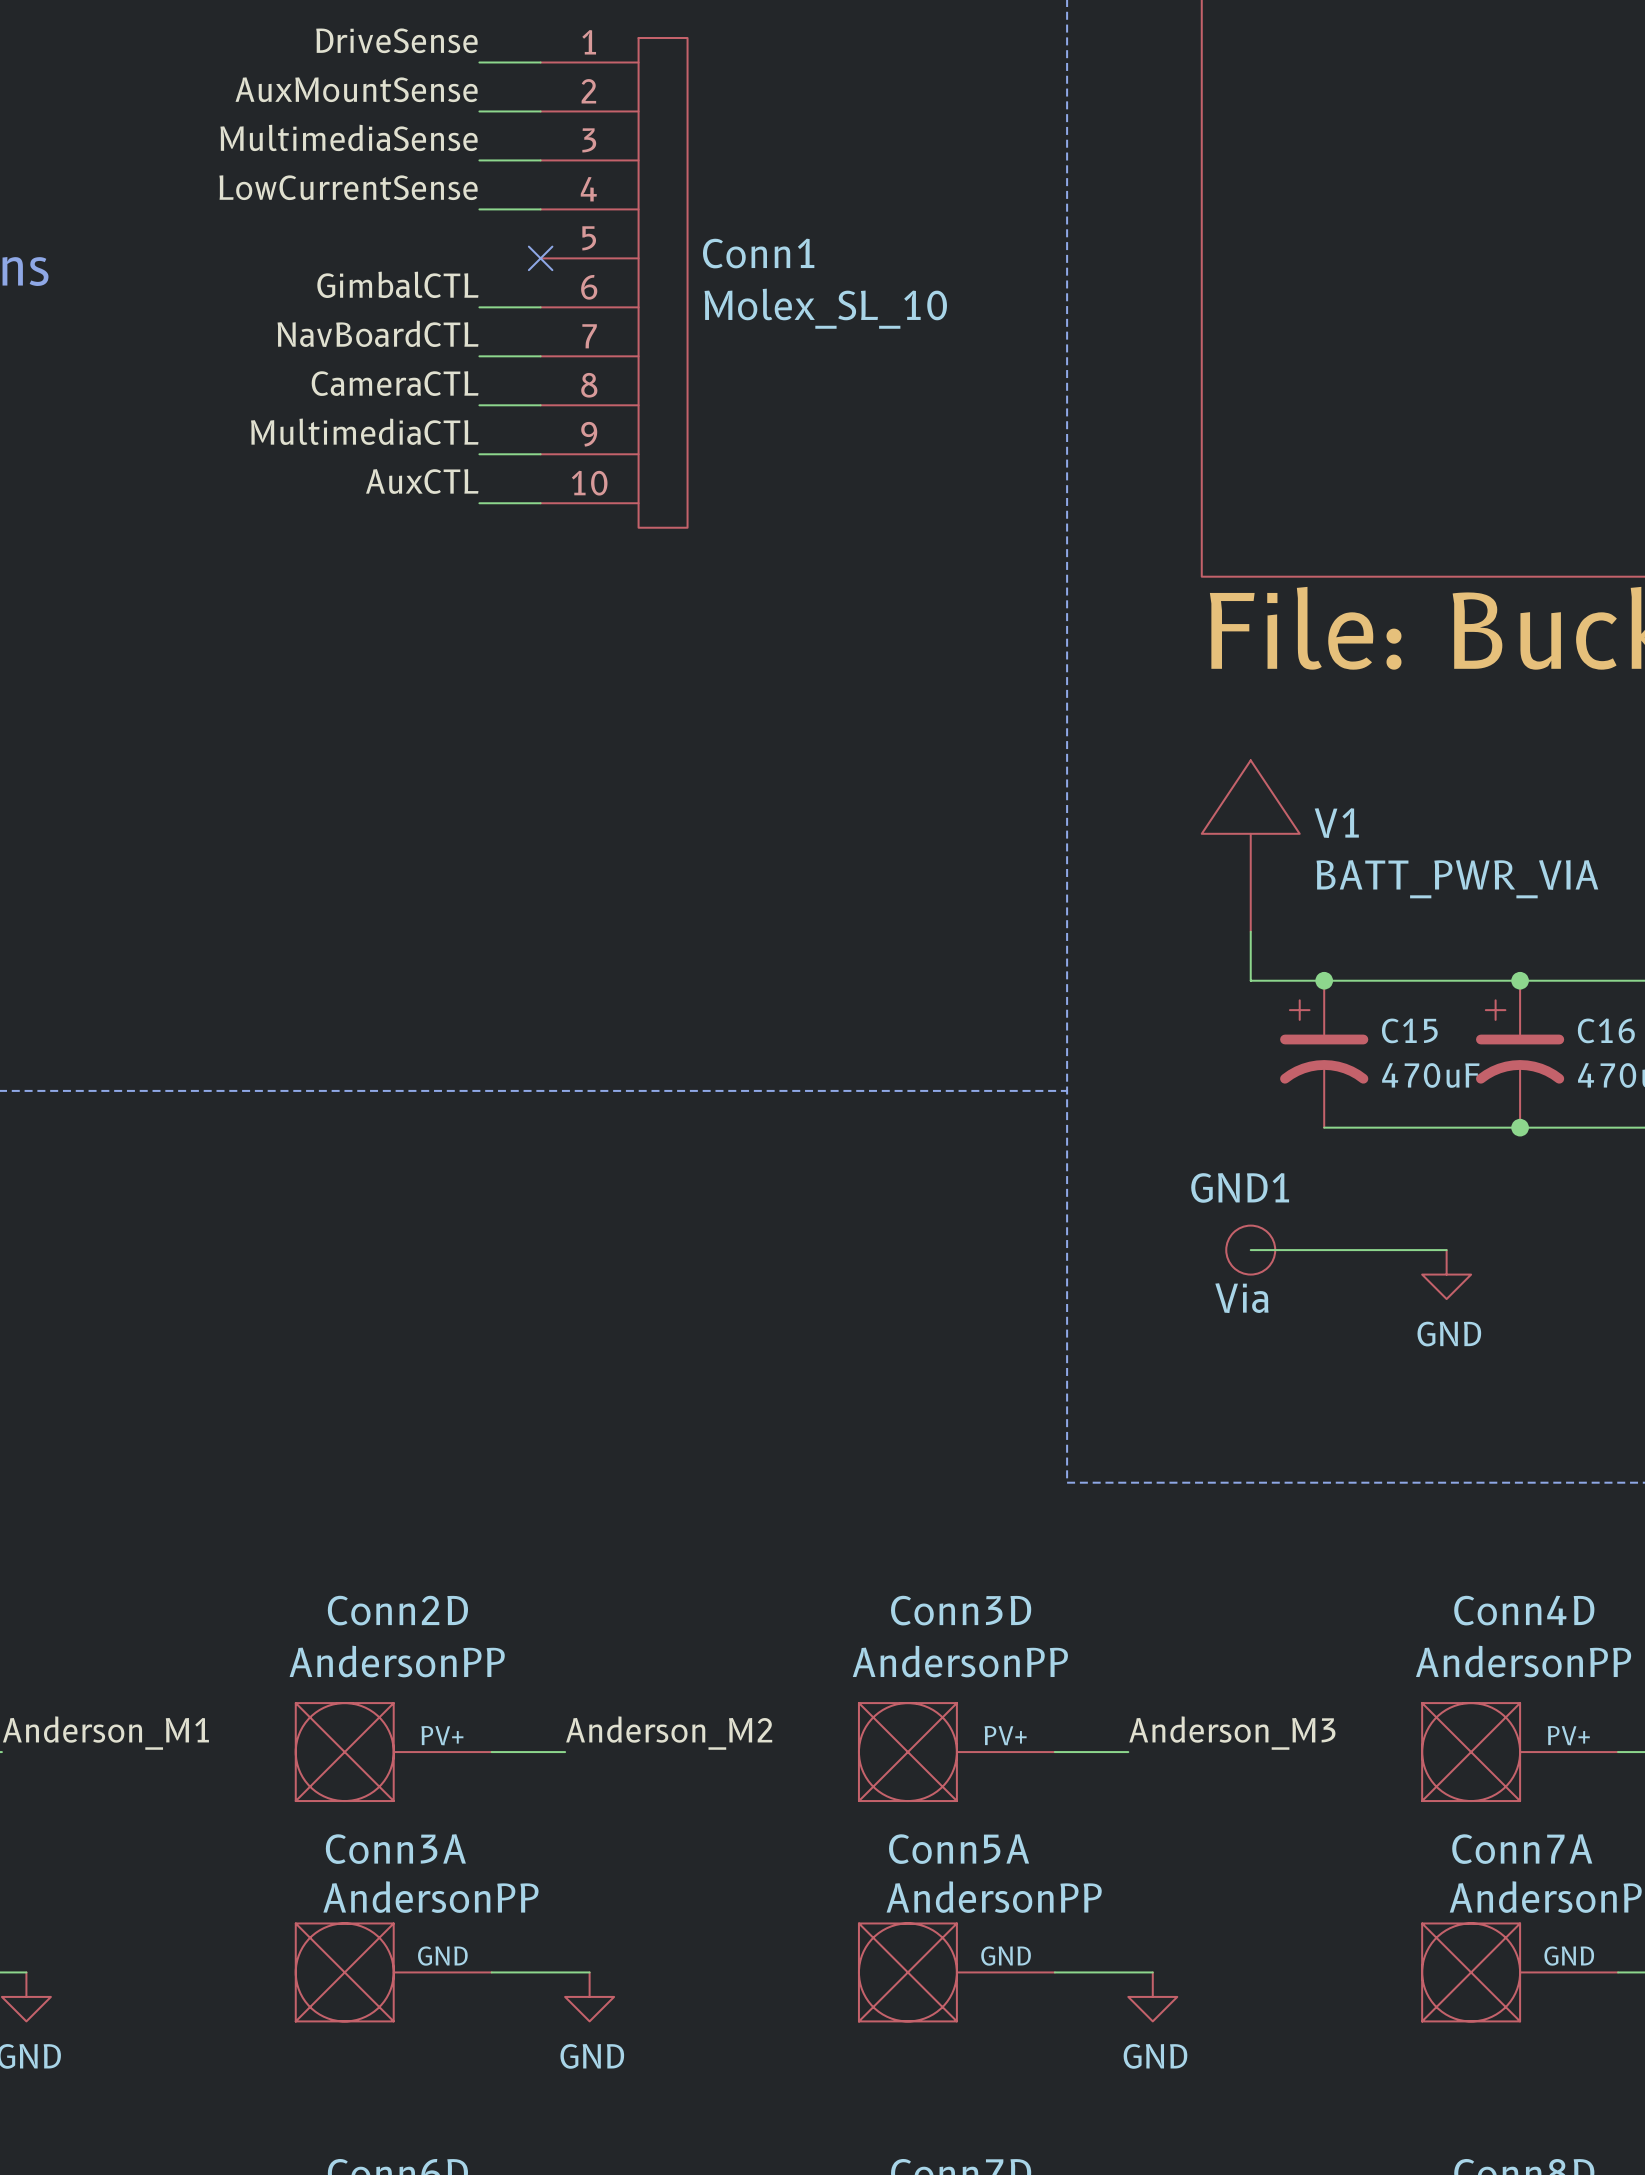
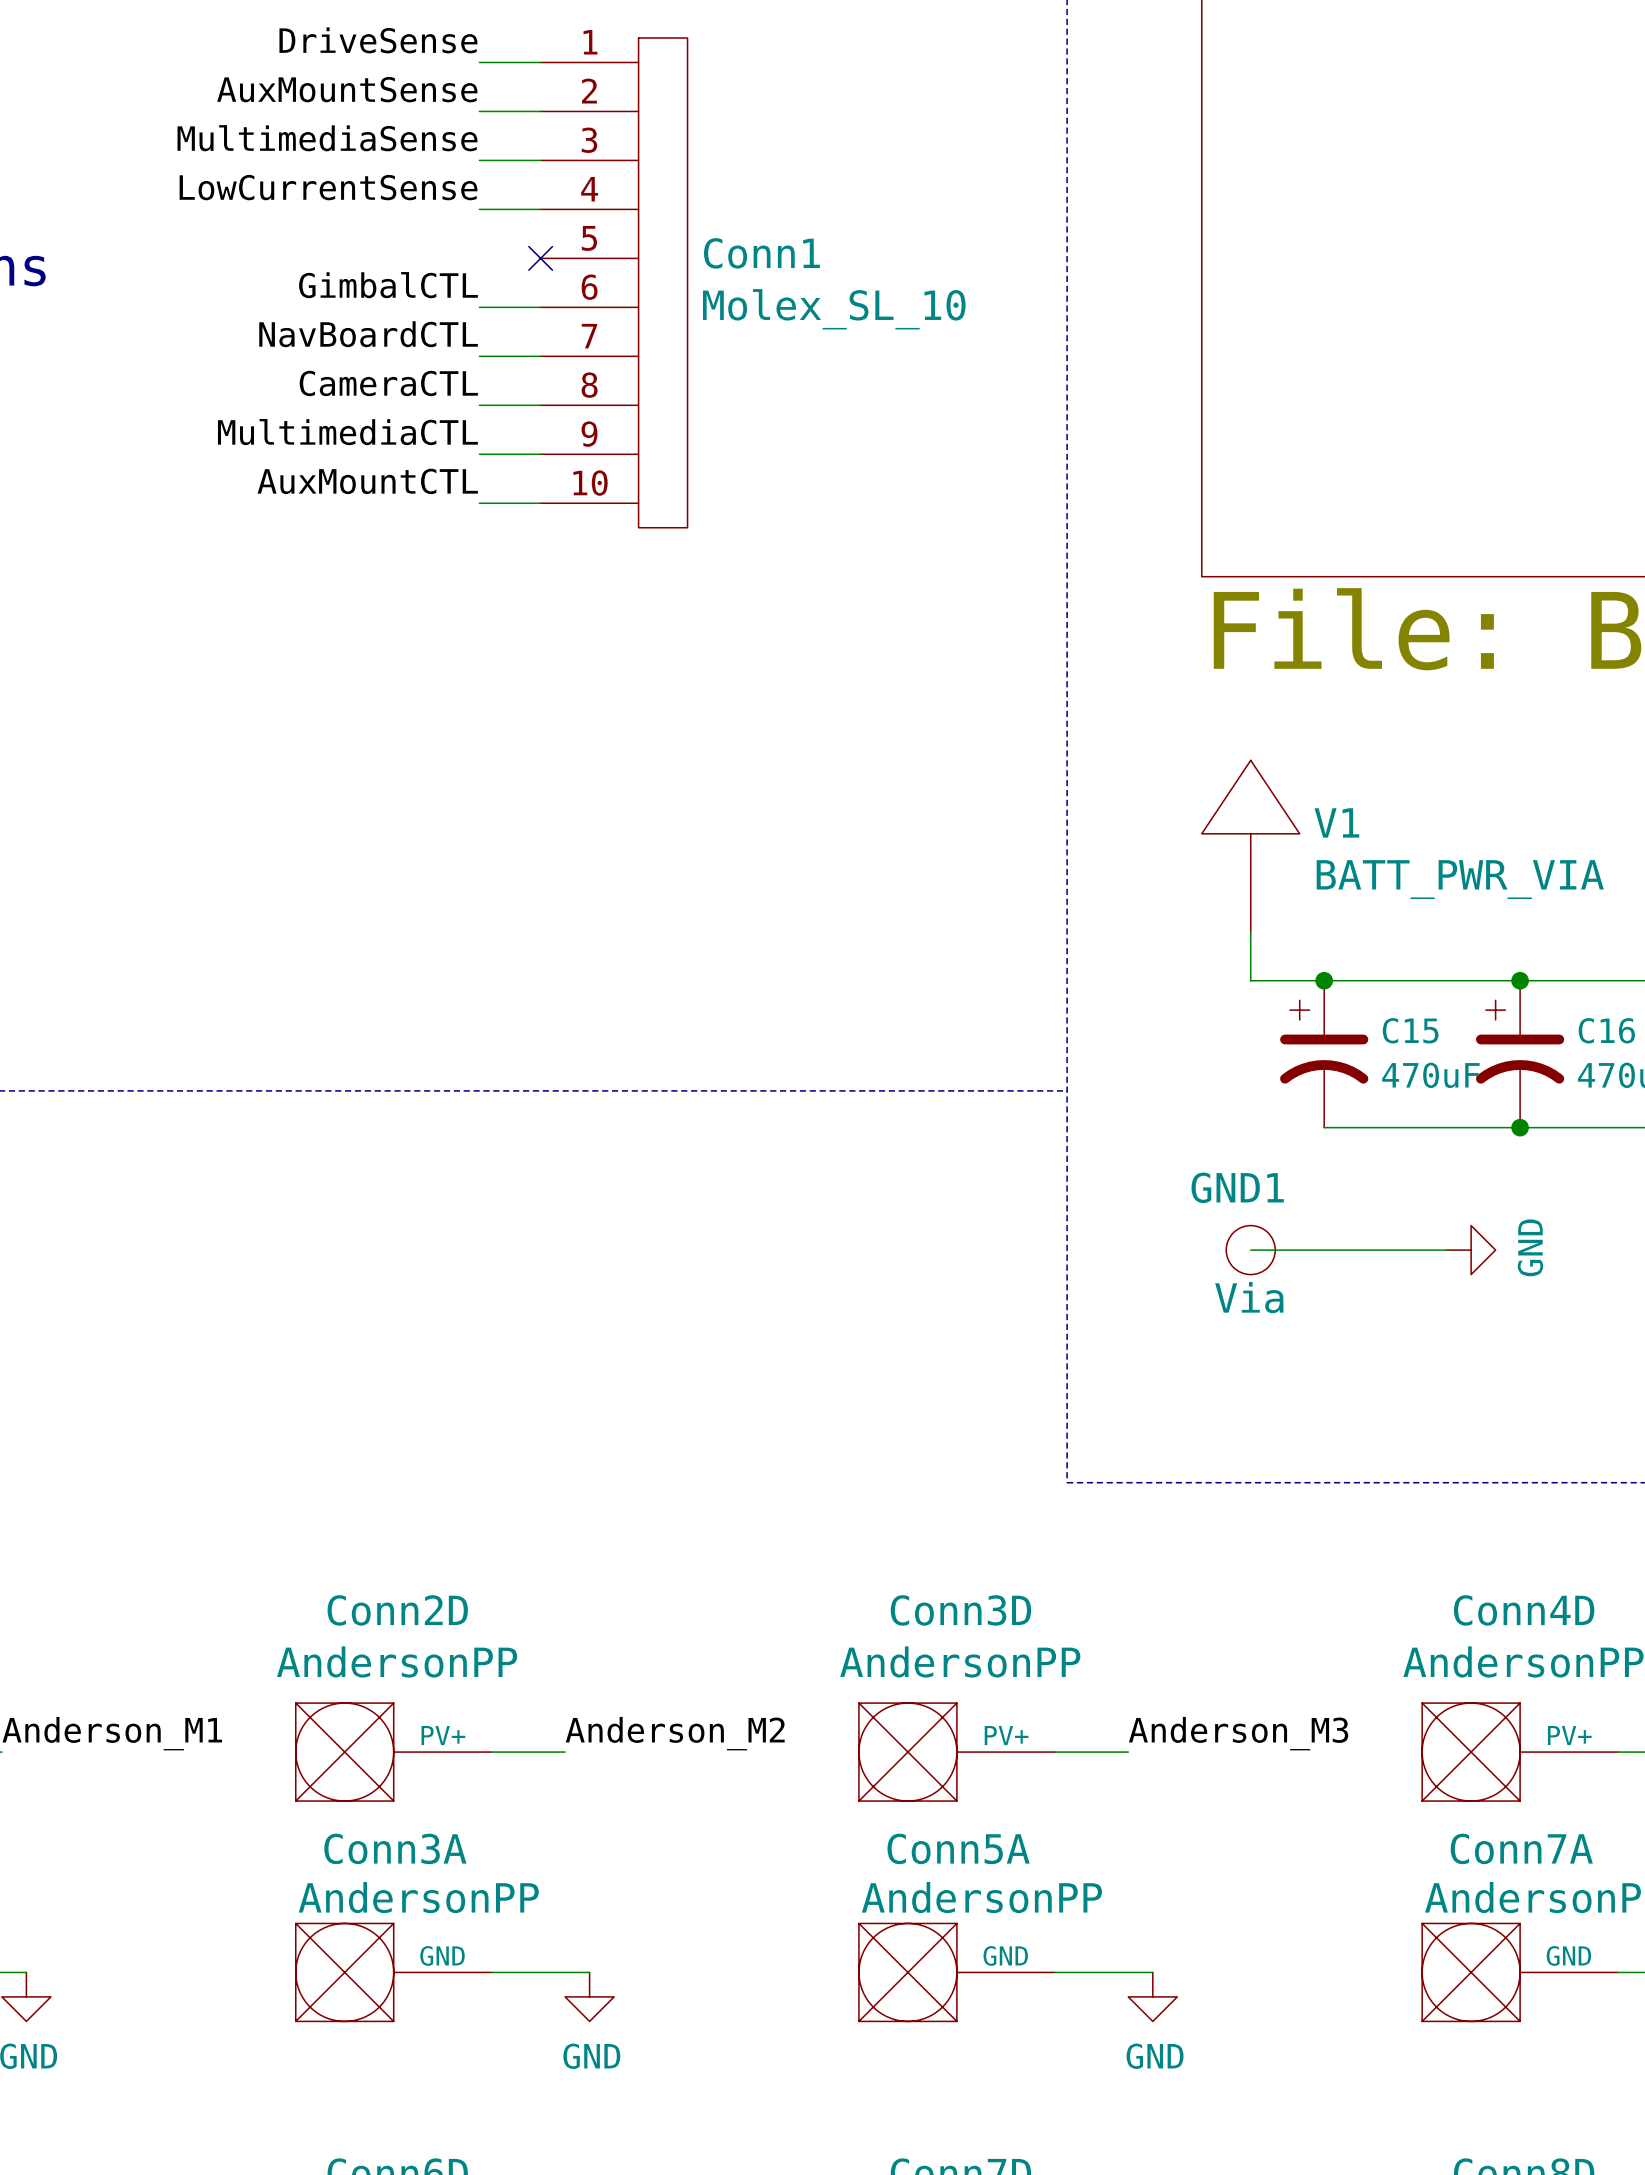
label: AuxCTL (422, 481) -> AuxMountCTL (367, 481)
power symbol rotation: 0° (1446, 1274) -> 90° counterclockwise (1471, 1250)
power symbol position: GND (1446, 1274) -> GND (1471, 1250)

